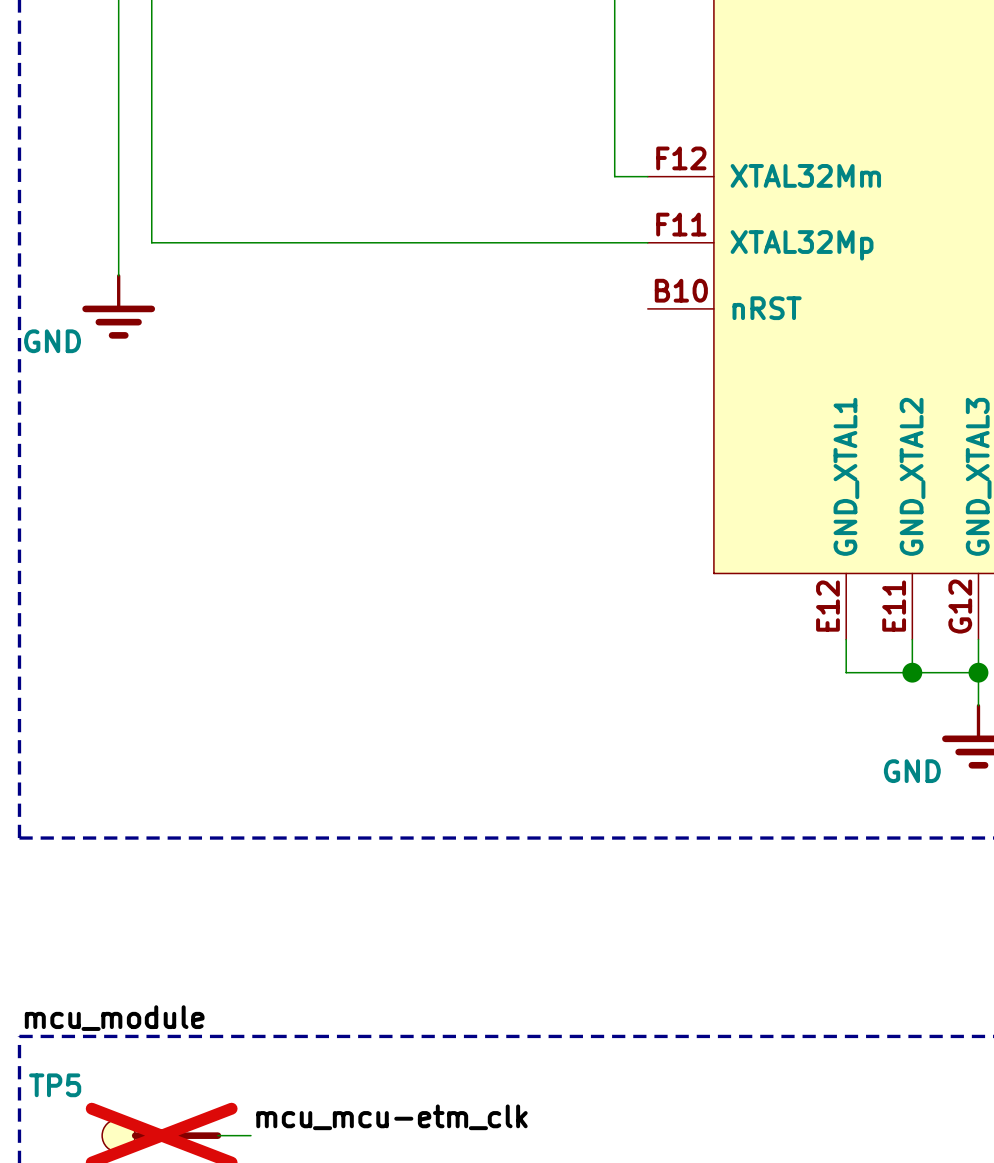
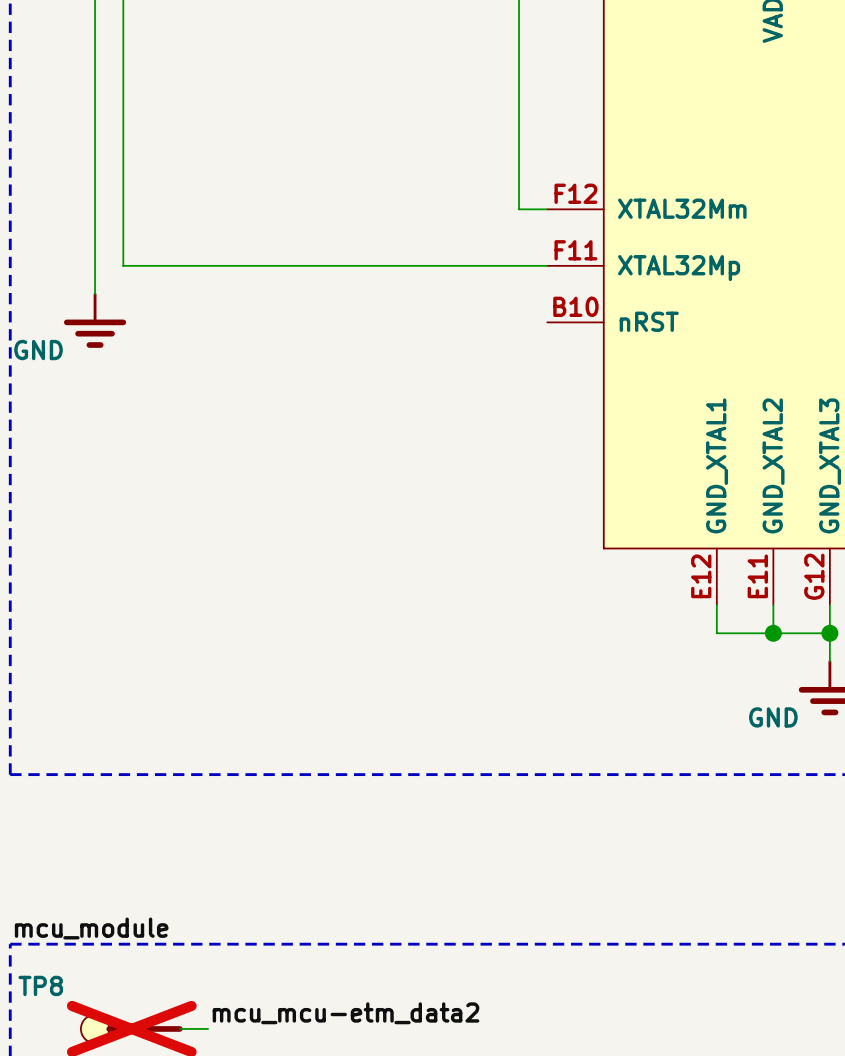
TP5 name: TP5 (55, 1085) -> TP8 (40, 985)
label: mcu_mcu-etm_clk (391, 1117) -> mcu_mcu-etm_data2 (346, 1013)

